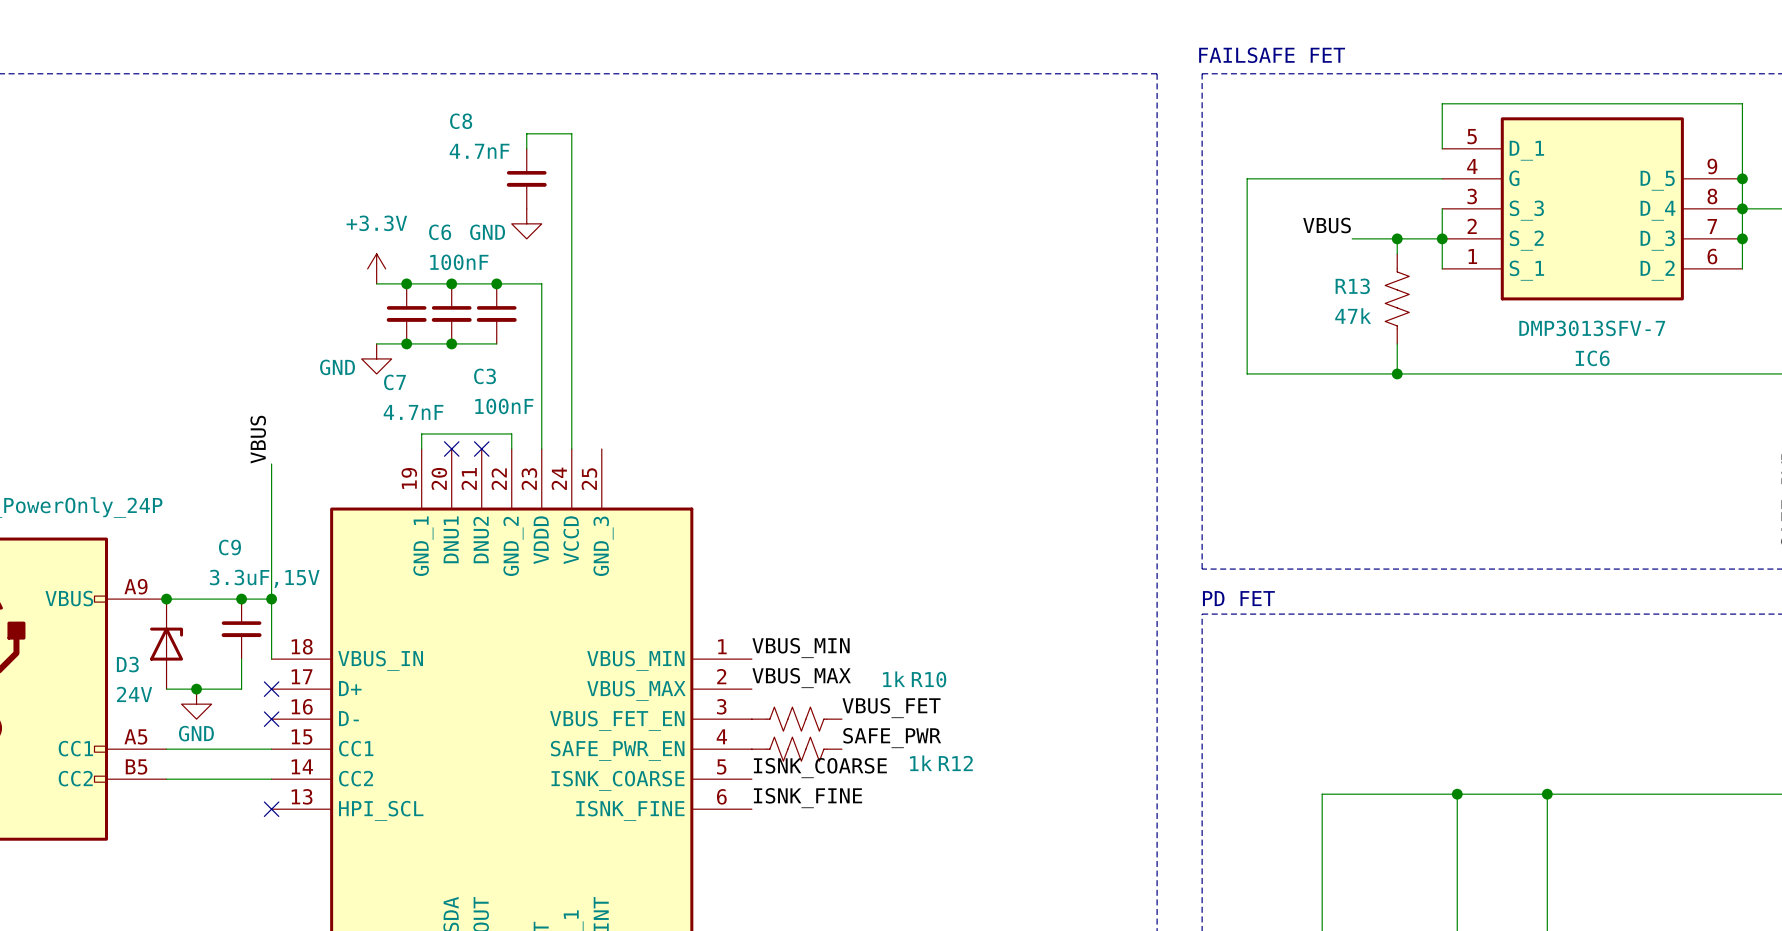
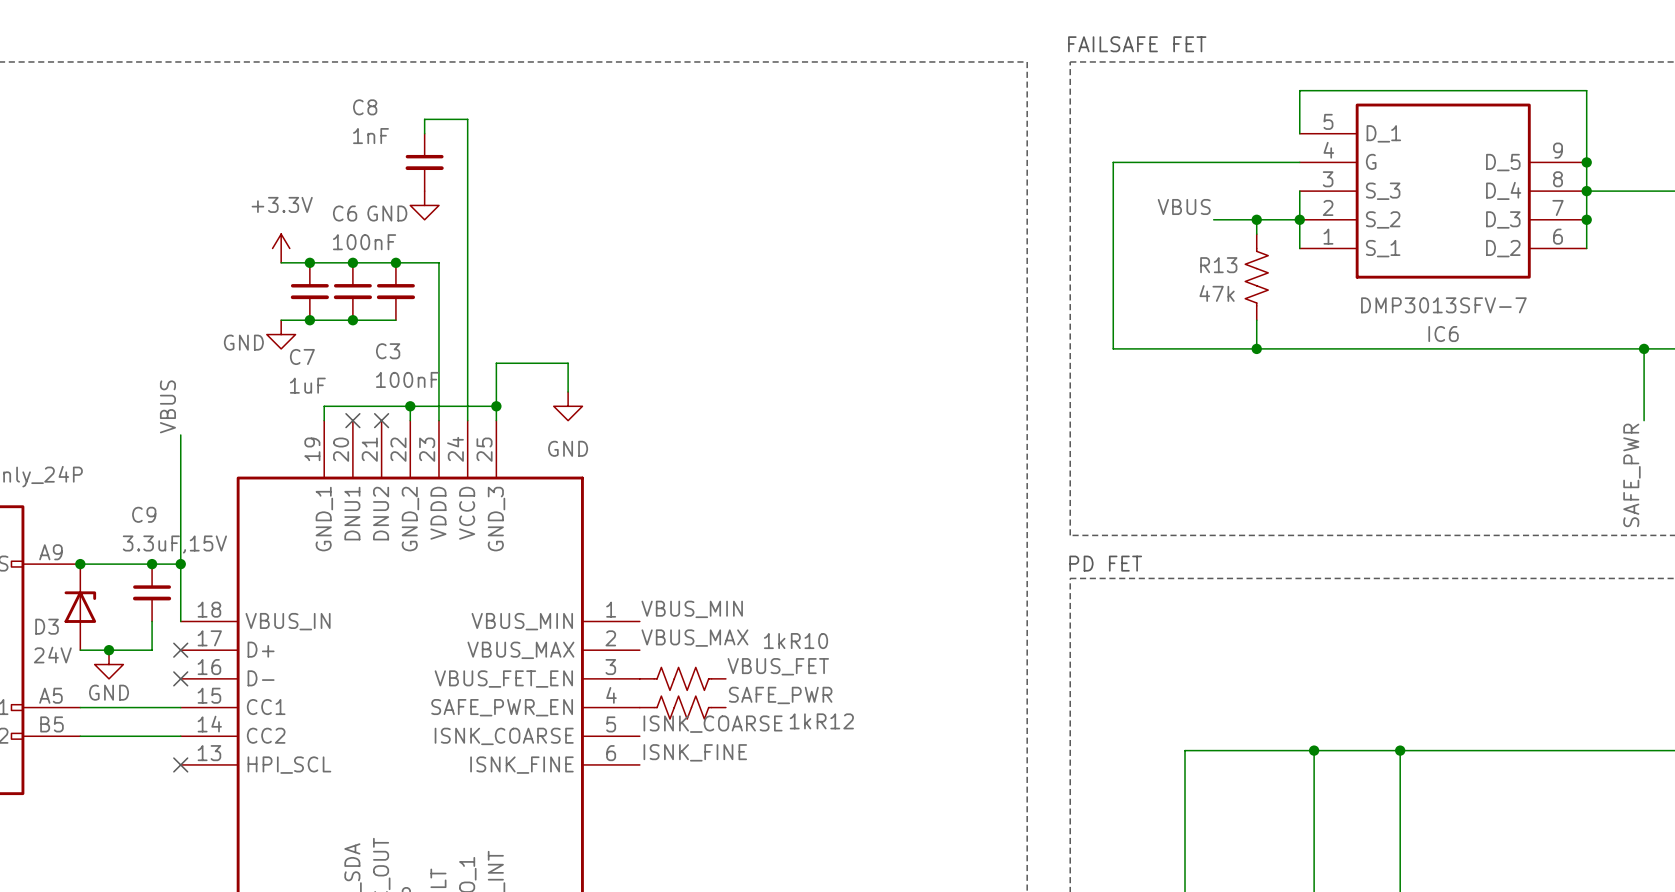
C8 value: 4.7nF (479, 151) -> 1nF (370, 136)
C7 value: 4.7nF (413, 412) -> 1uF (307, 385)
wire: none -> (568, 391) (568, 363) (496, 363) (496, 420)
wire: none -> (410, 406) (496, 406)
junction: none -> (410, 406)
junction: none -> (496, 406)
power symbol: none -> GND (568, 406)

